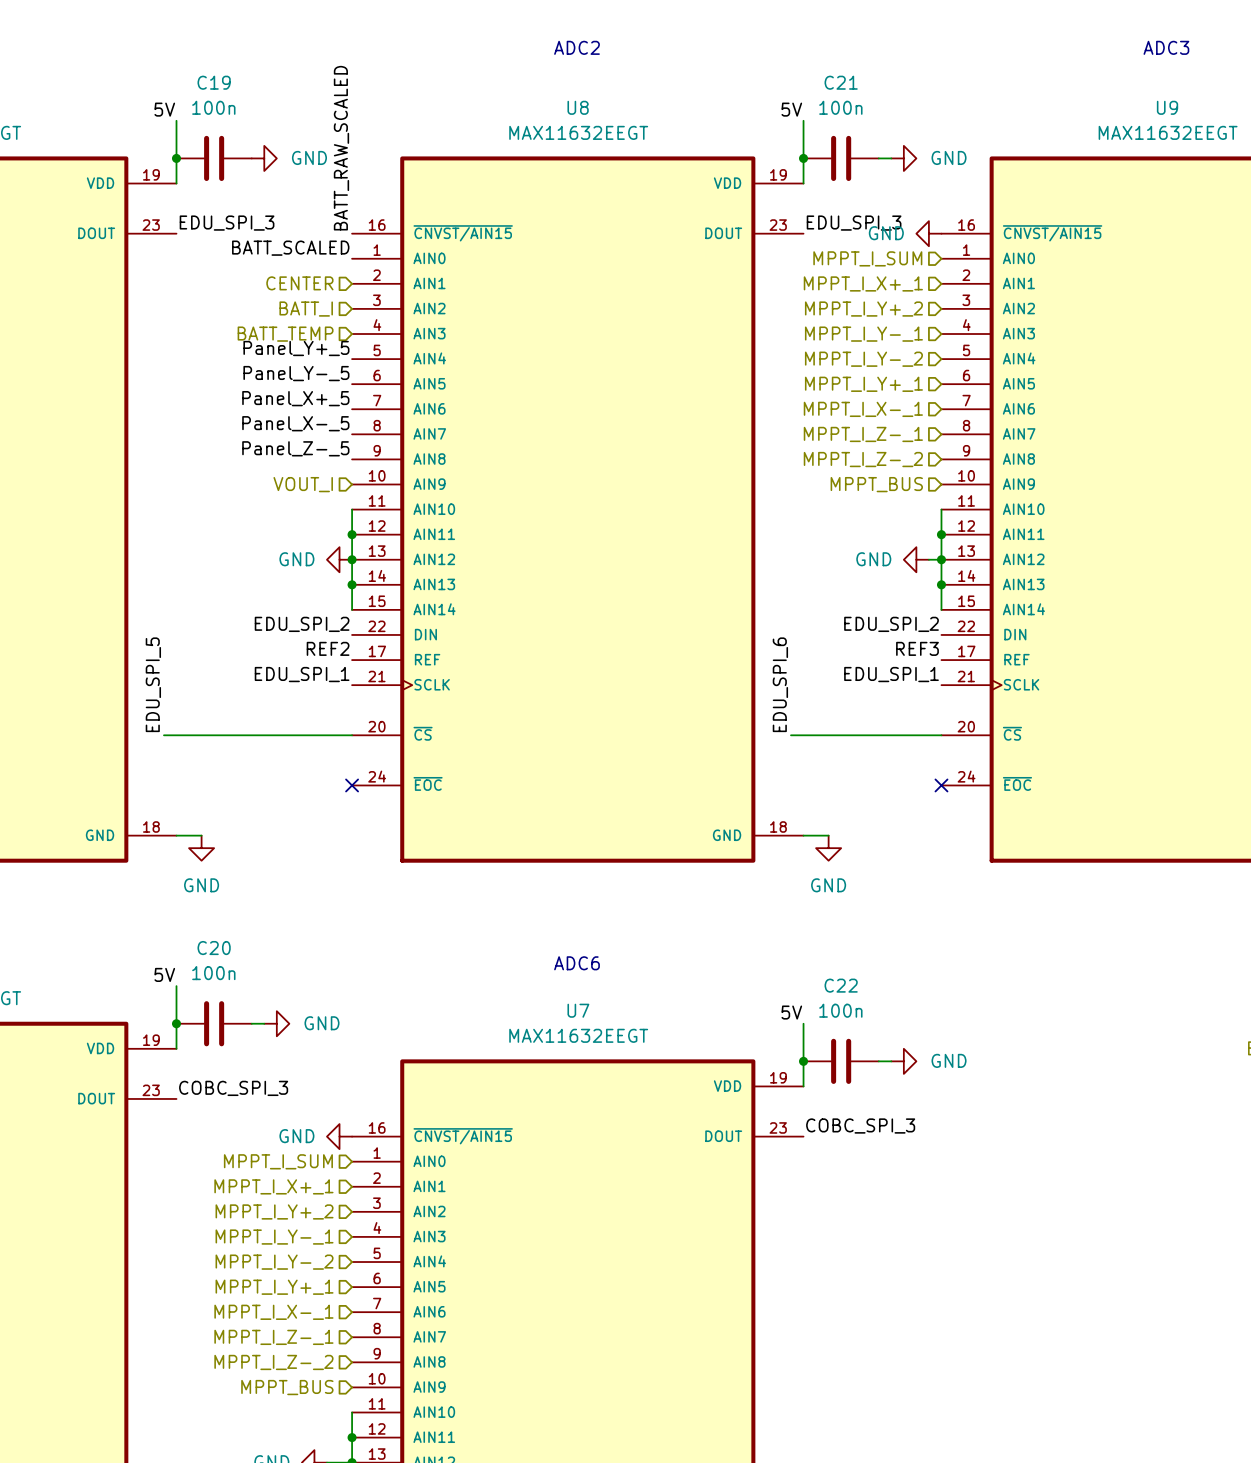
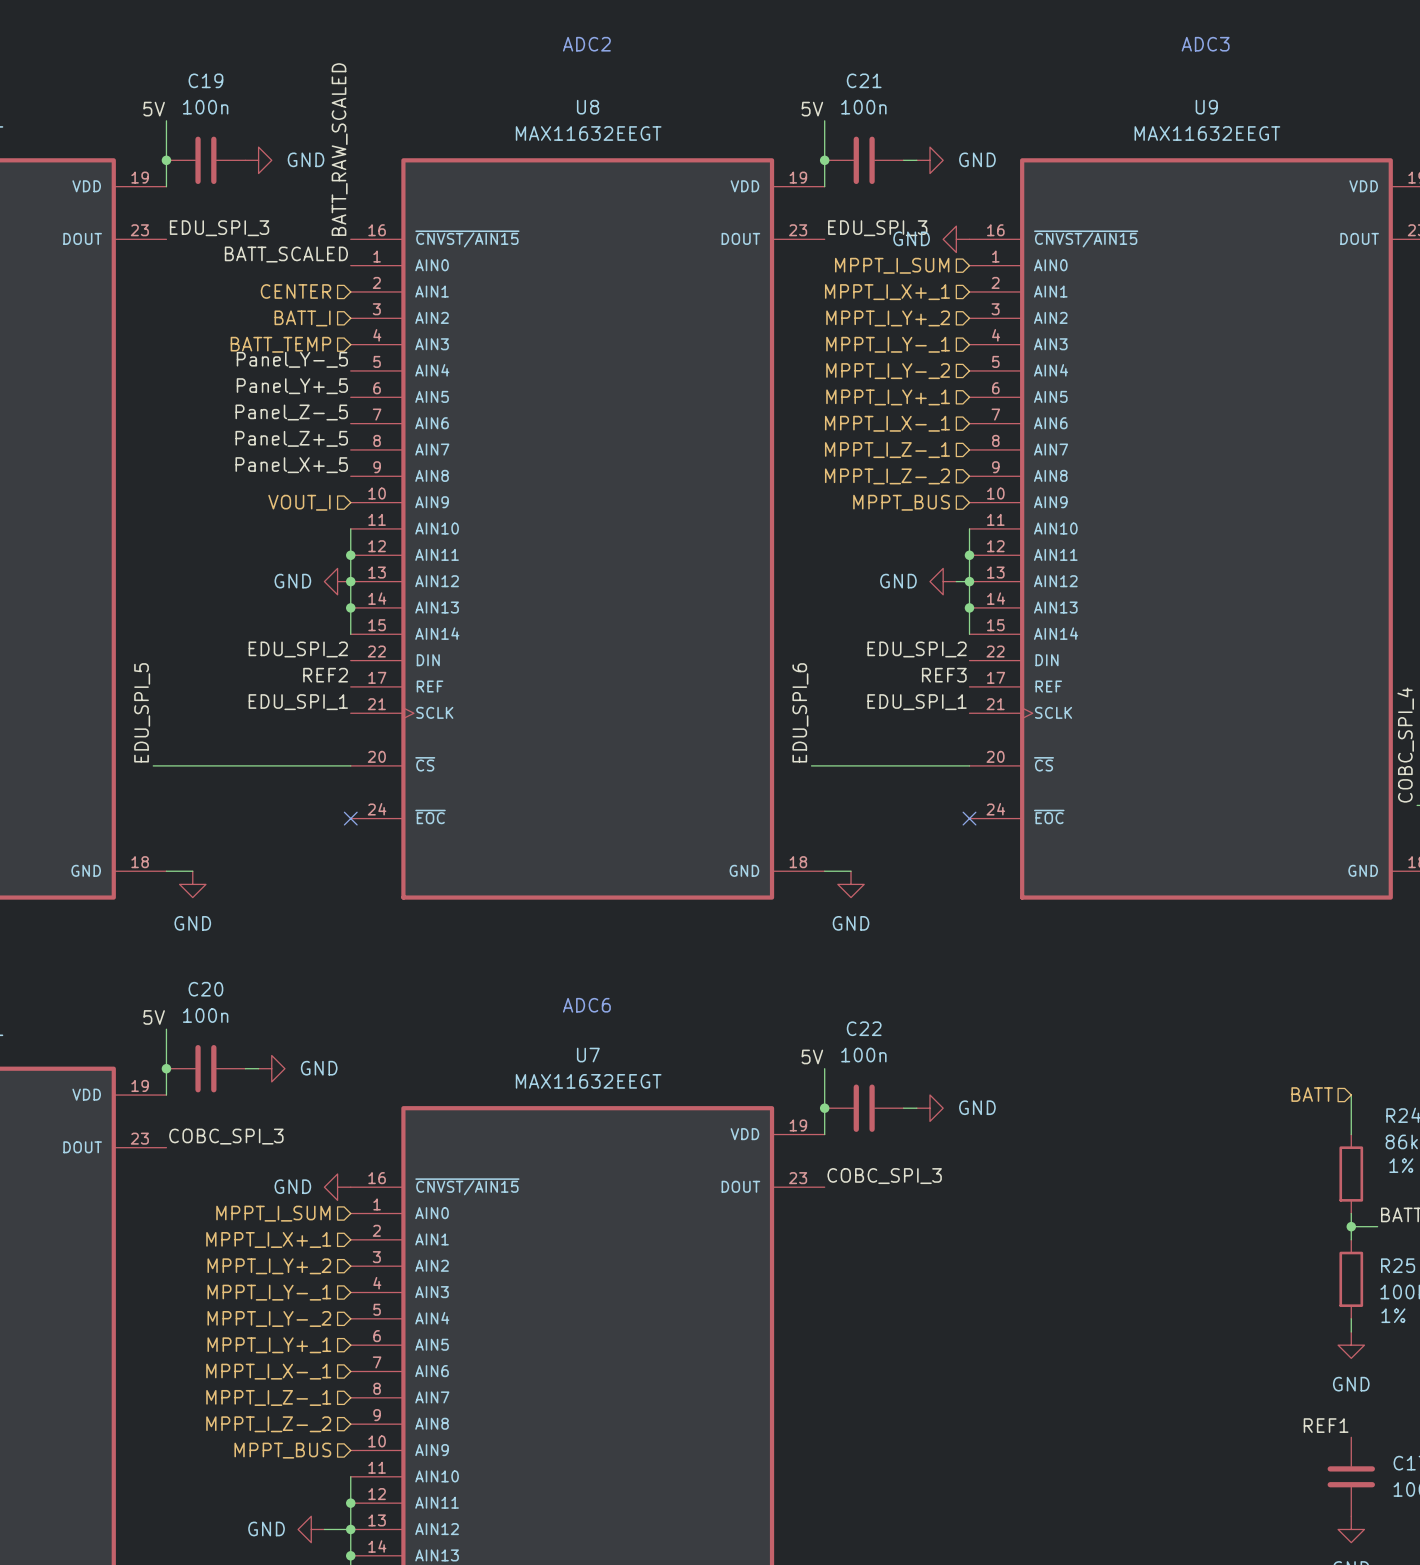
label: Panel_Y+_5 (296, 348) -> Panel_Y-_5 (292, 359)
label: Panel_Y-_5 (296, 373) -> Panel_Y+_5 (292, 386)
label: Panel_X+_5 (295, 398) -> Panel_Z-_5 (291, 412)
label: Panel_X-_5 (295, 423) -> Panel_Z+_5 (291, 438)
label: Panel_Z-_5 (295, 448) -> Panel_X+_5 (291, 465)

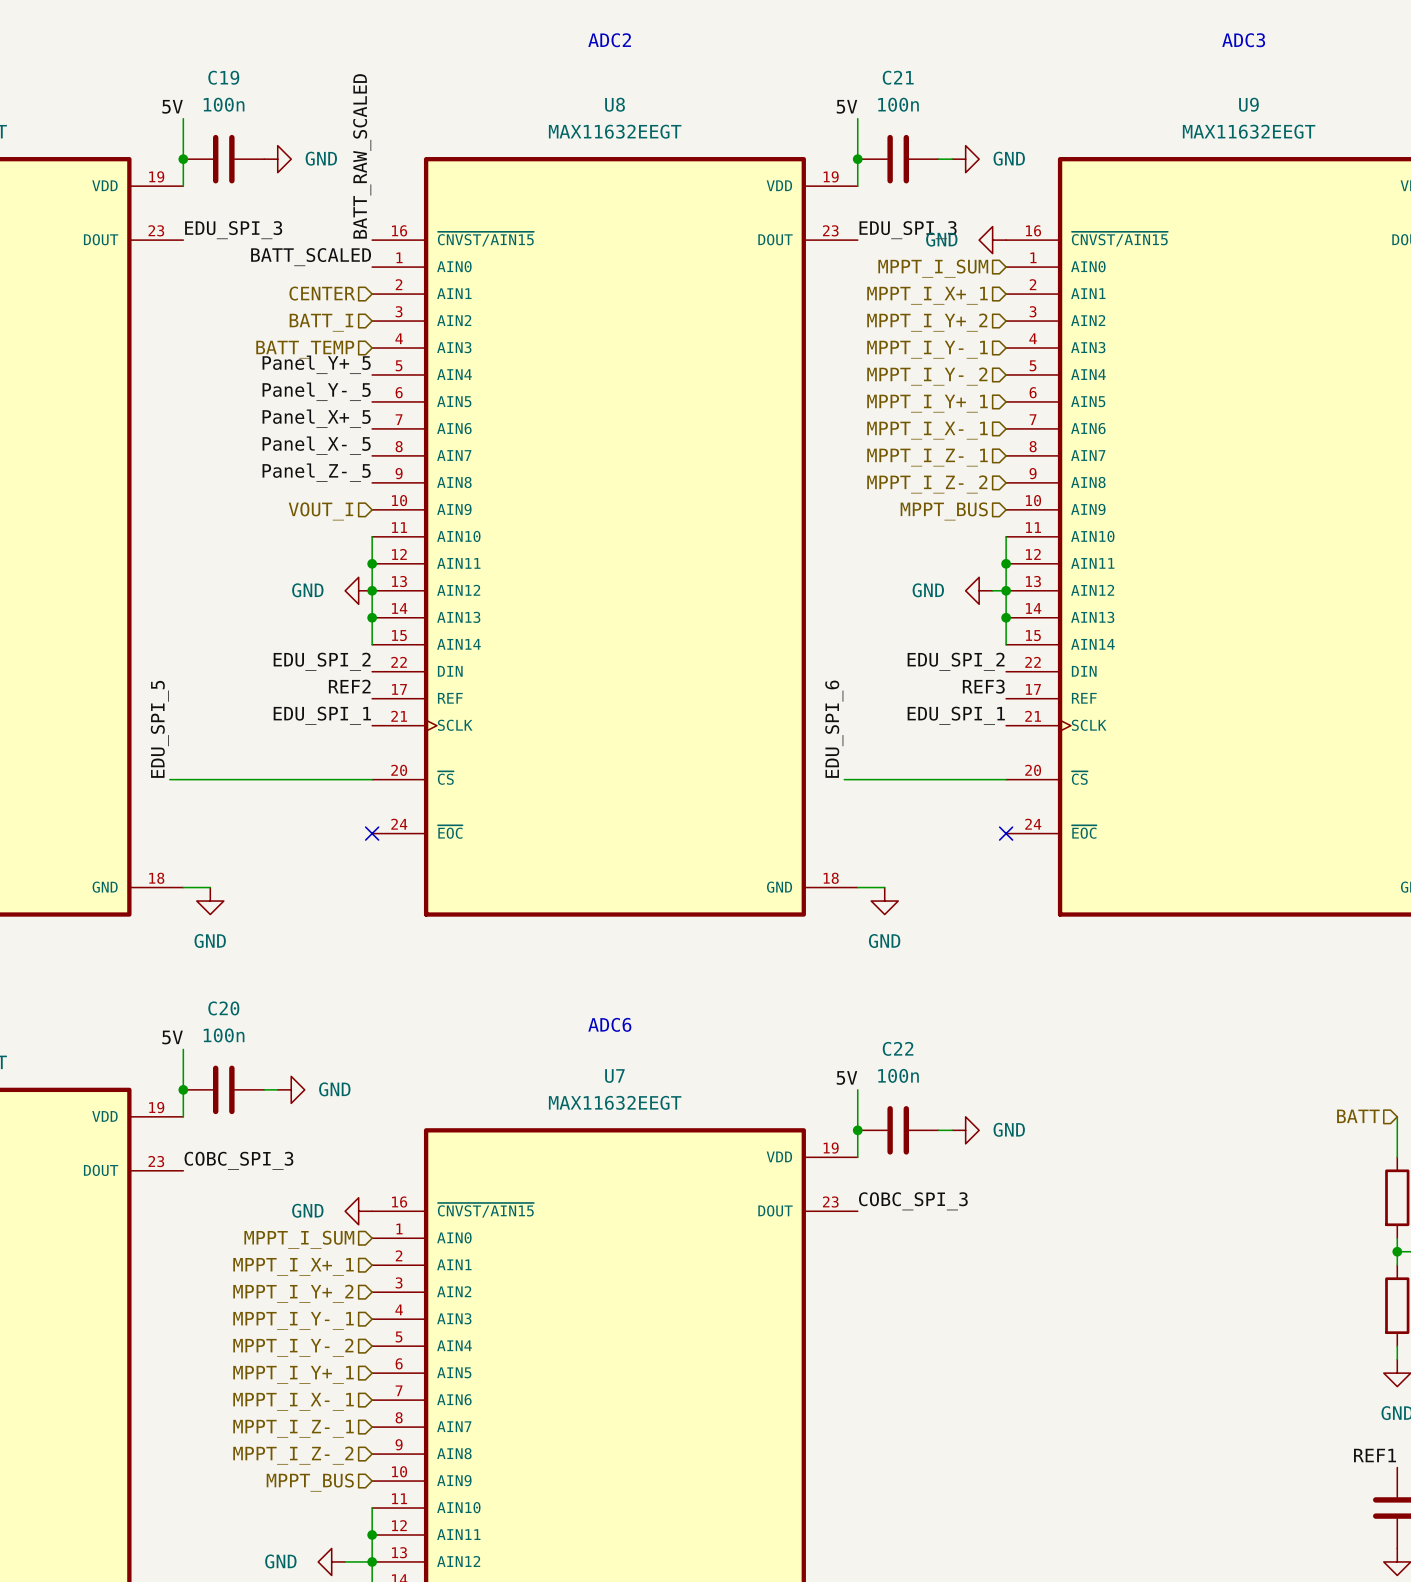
label: Panel_Y-_5 (292, 359) -> Panel_Y+_5 (316, 364)
label: Panel_Y+_5 (292, 386) -> Panel_Y-_5 (316, 391)
label: Panel_Z-_5 (291, 412) -> Panel_X+_5 (316, 418)
label: Panel_Z+_5 (291, 438) -> Panel_X-_5 (316, 445)
label: Panel_X+_5 (291, 465) -> Panel_Z-_5 (316, 472)

